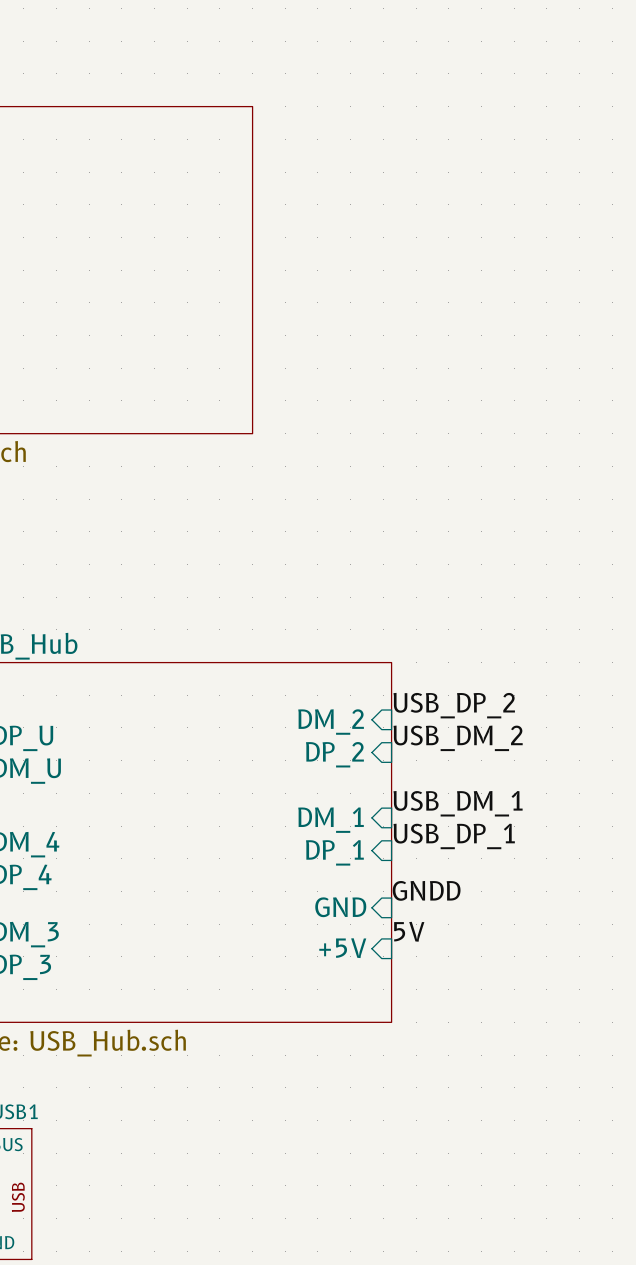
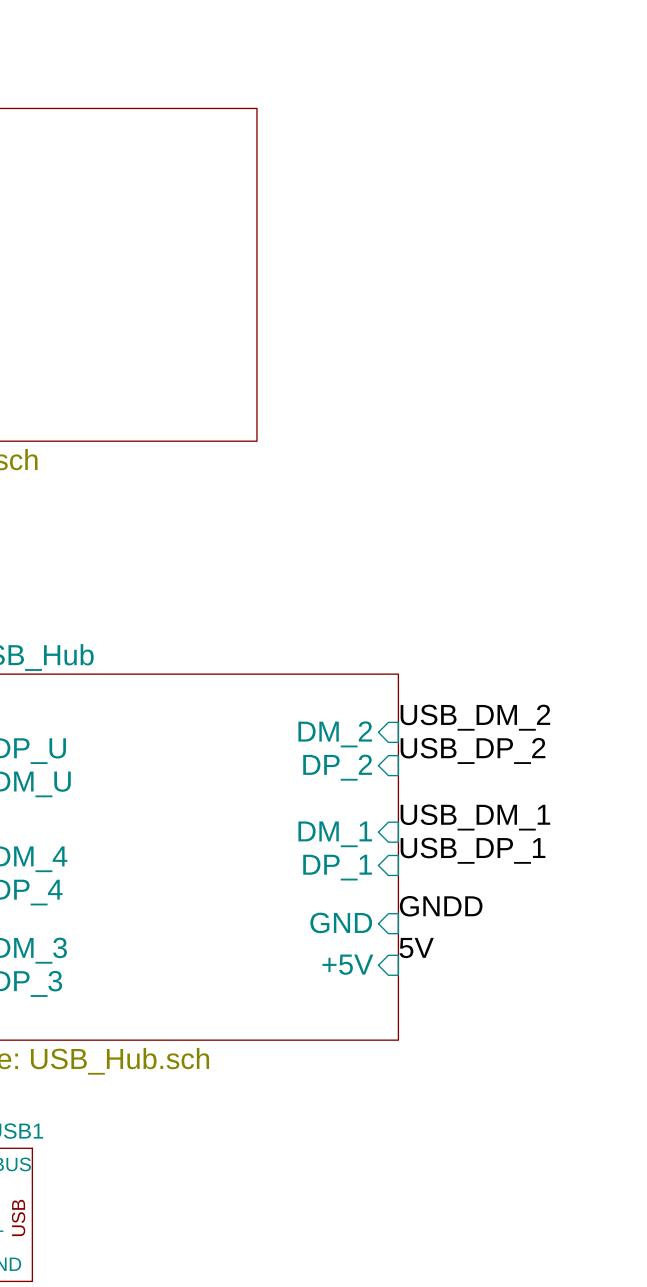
label: USB_DP_2 (454, 705) -> USB_DM_2 (475, 717)
label: USB_DM_2 (458, 738) -> USB_DP_2 (472, 750)

